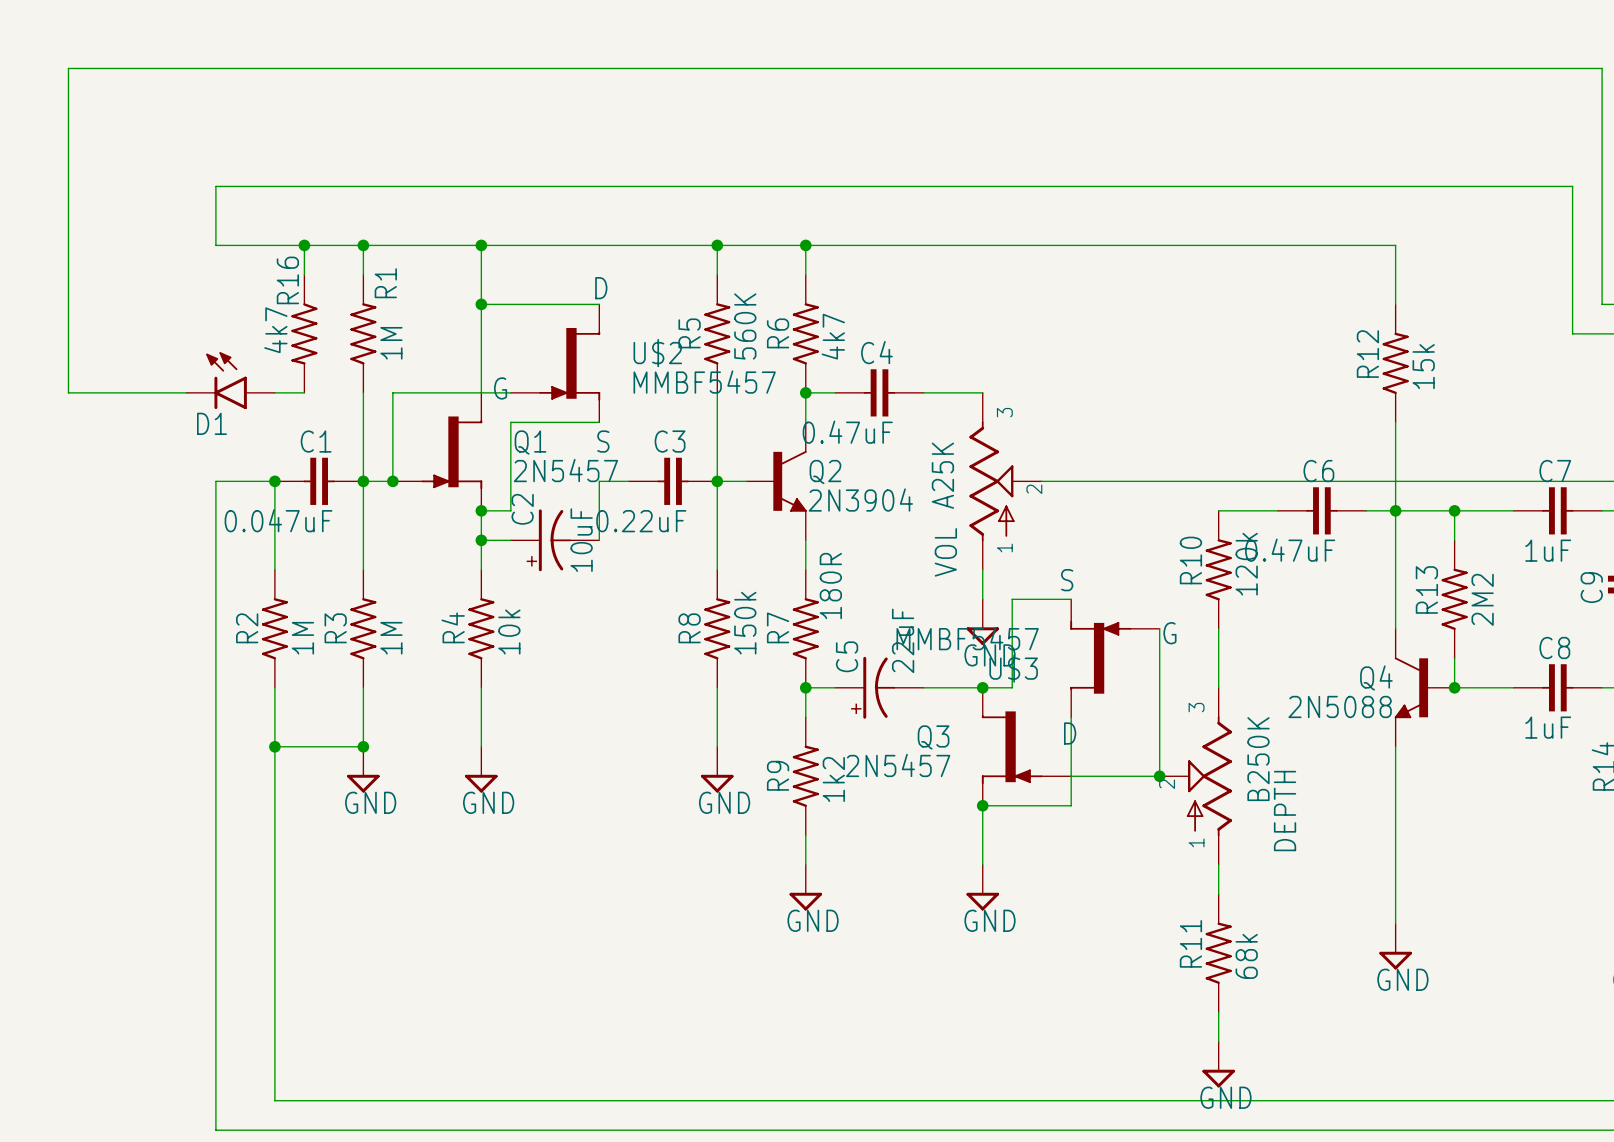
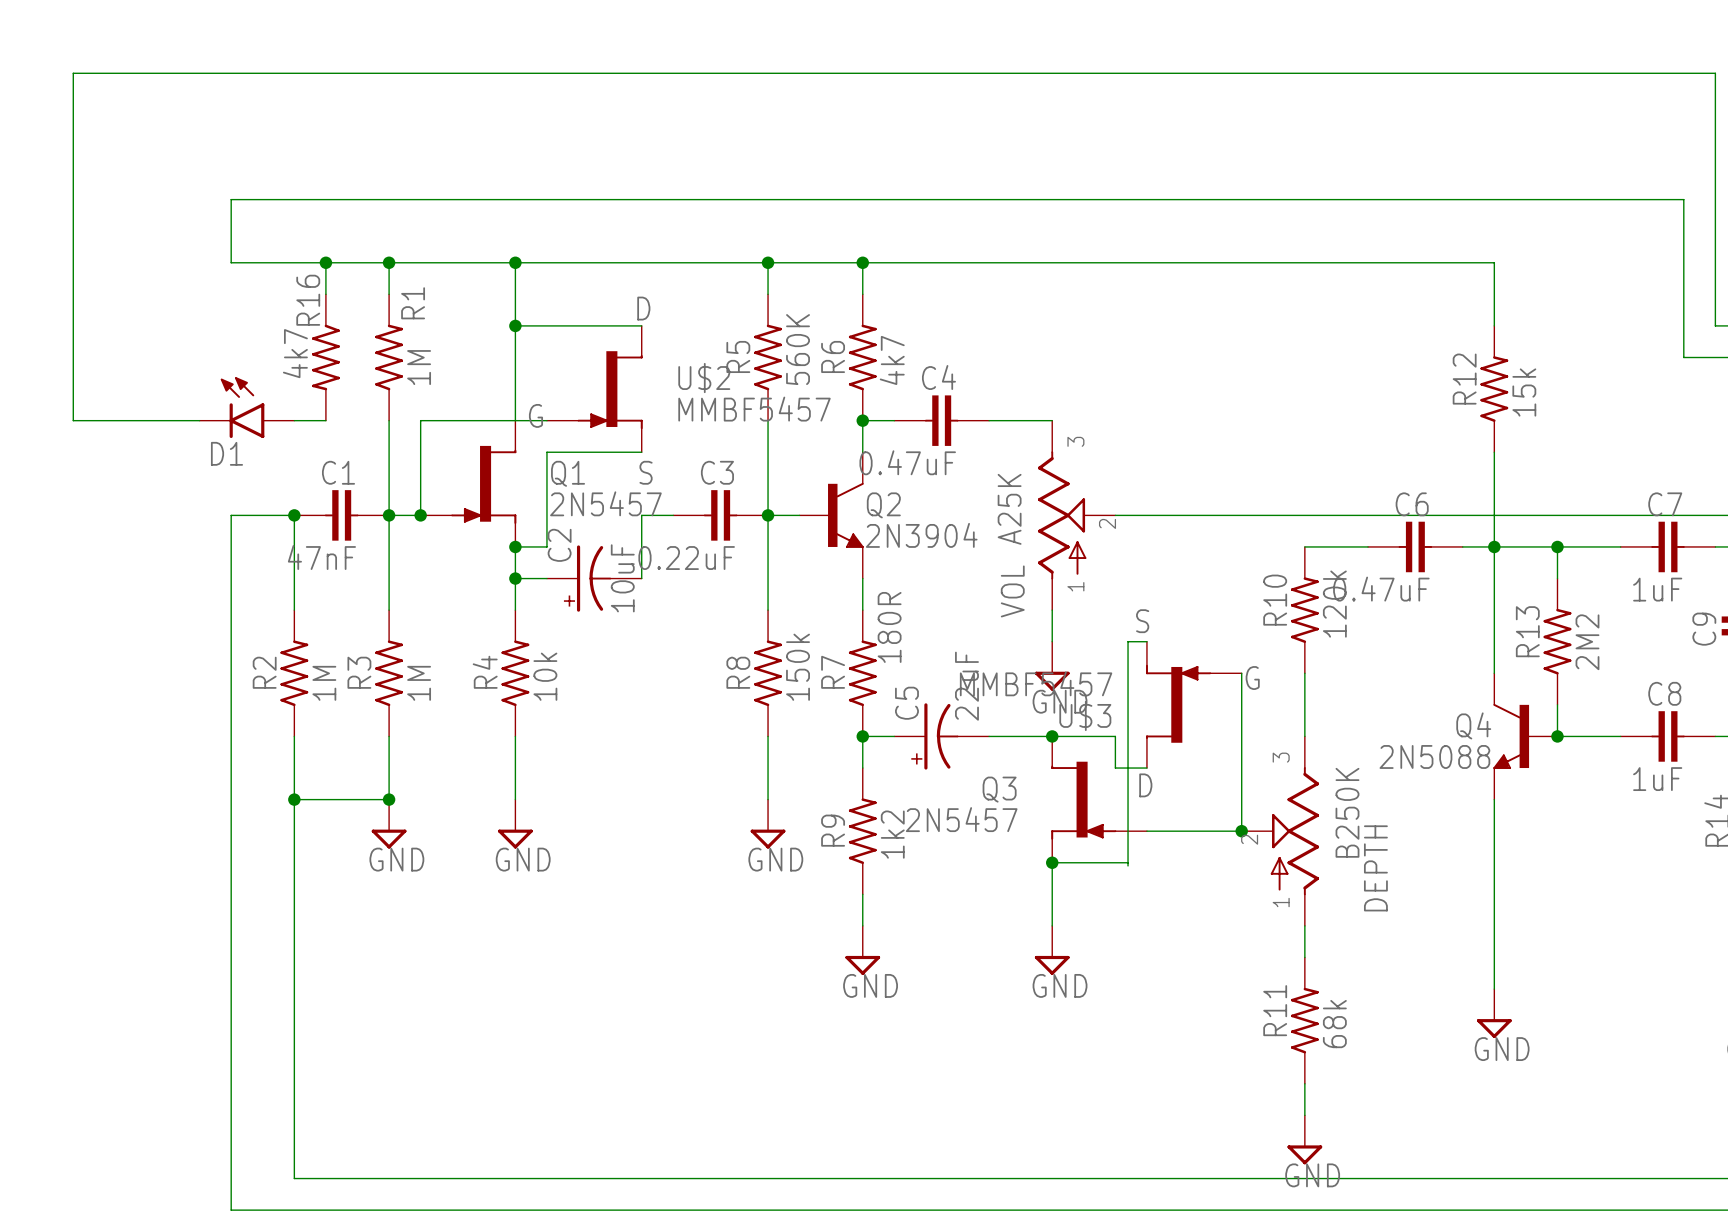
C1 value: 0.047uF (278, 520) -> 47nF (321, 557)
wire: (1053, 599) (1012, 599) (1012, 687) -> (1146, 768) (1115, 768) (1115, 736) (1083, 736)
wire: none -> (1128, 641) (1128, 865)
wire: (1071, 717) (1071, 805) (1053, 805) -> none

